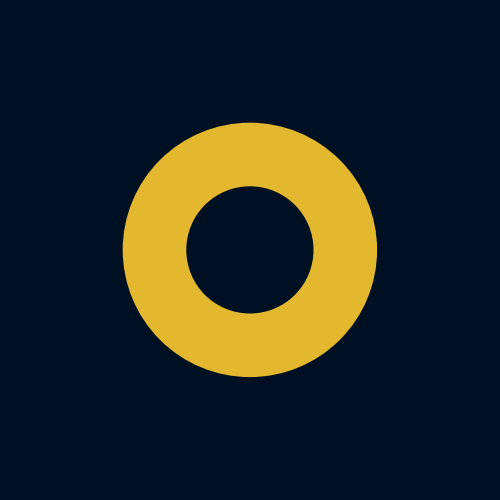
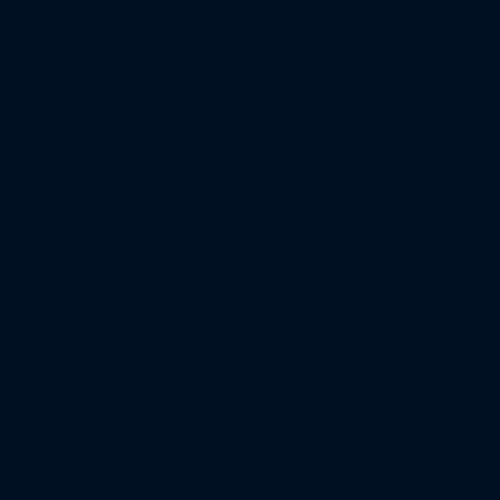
part: (249, 249) -> none

